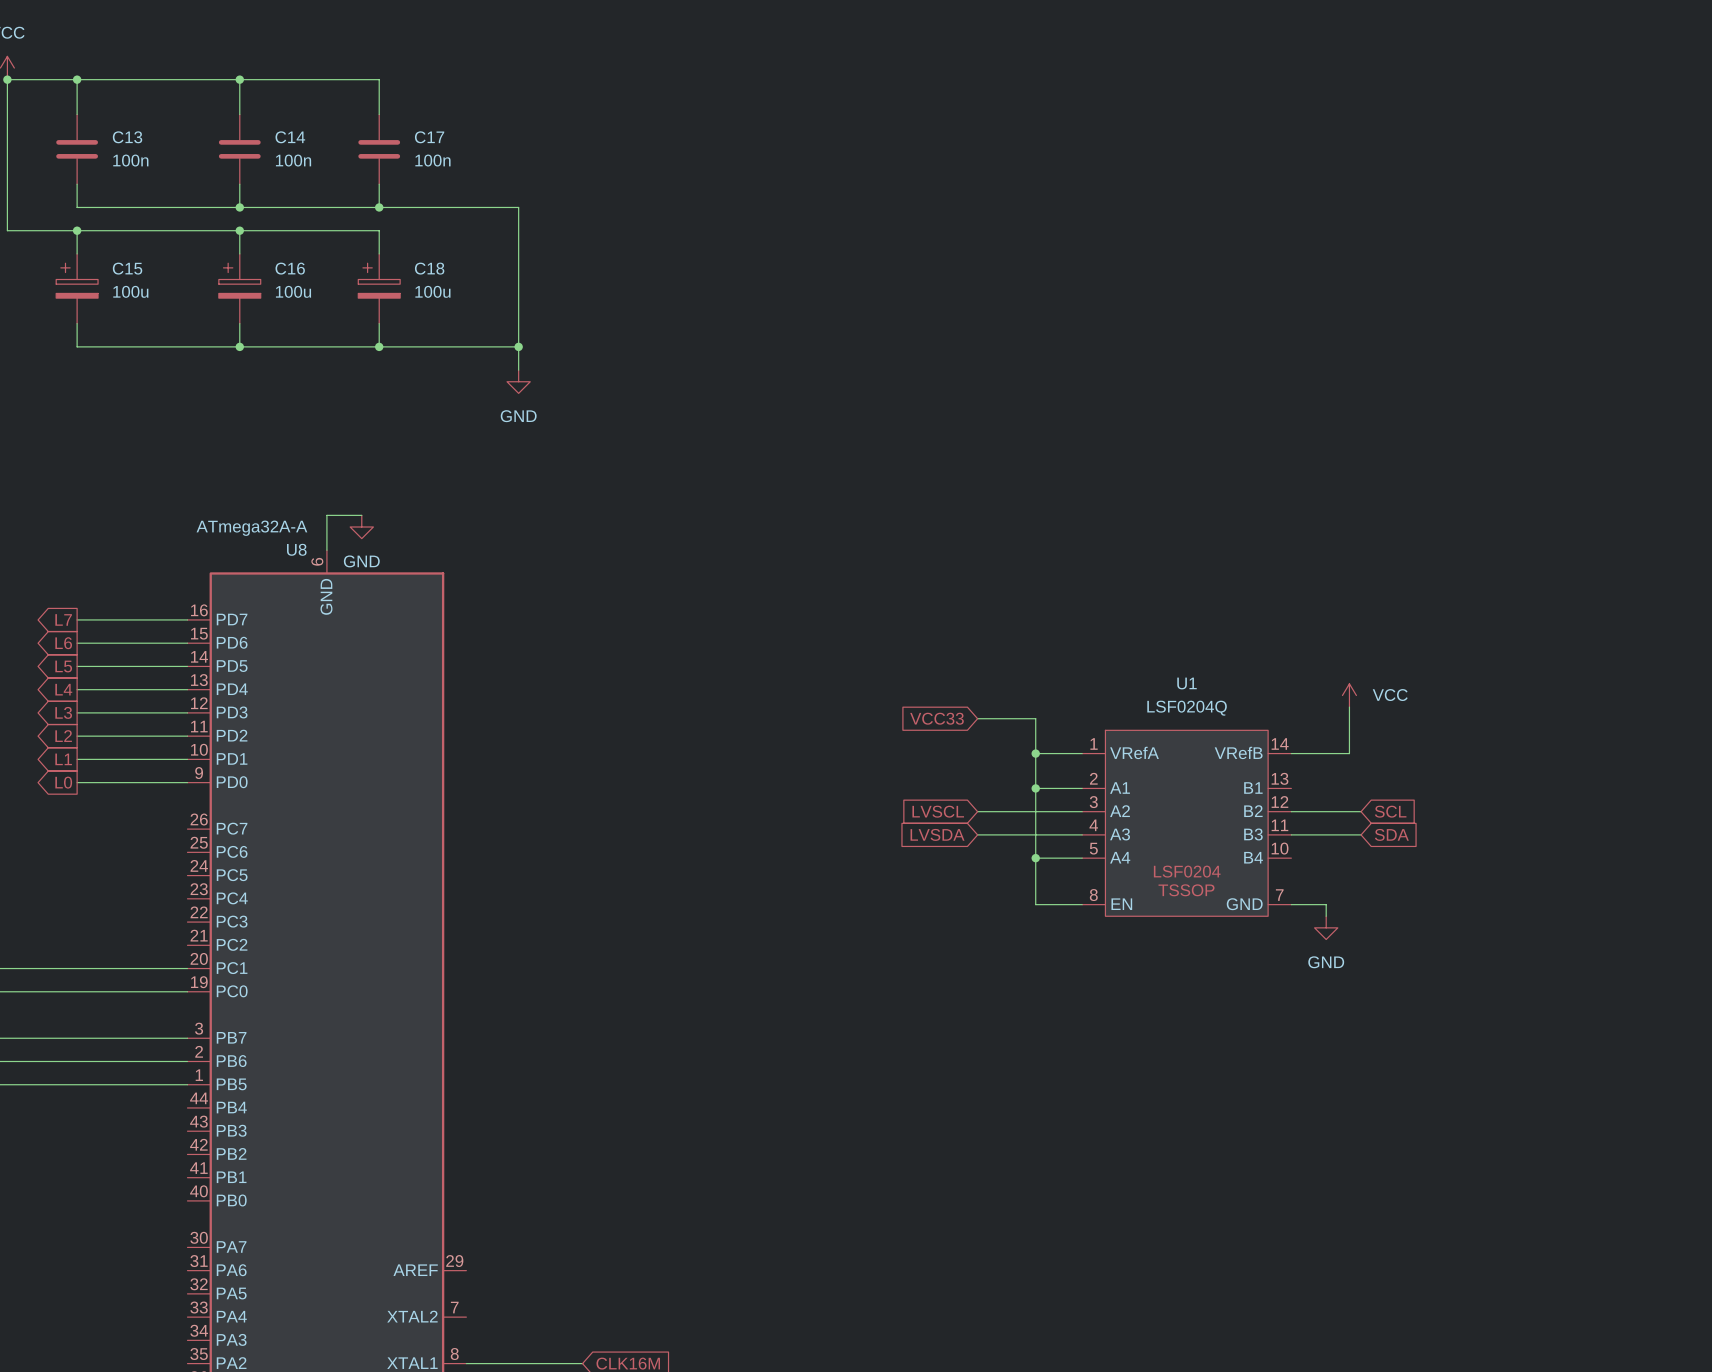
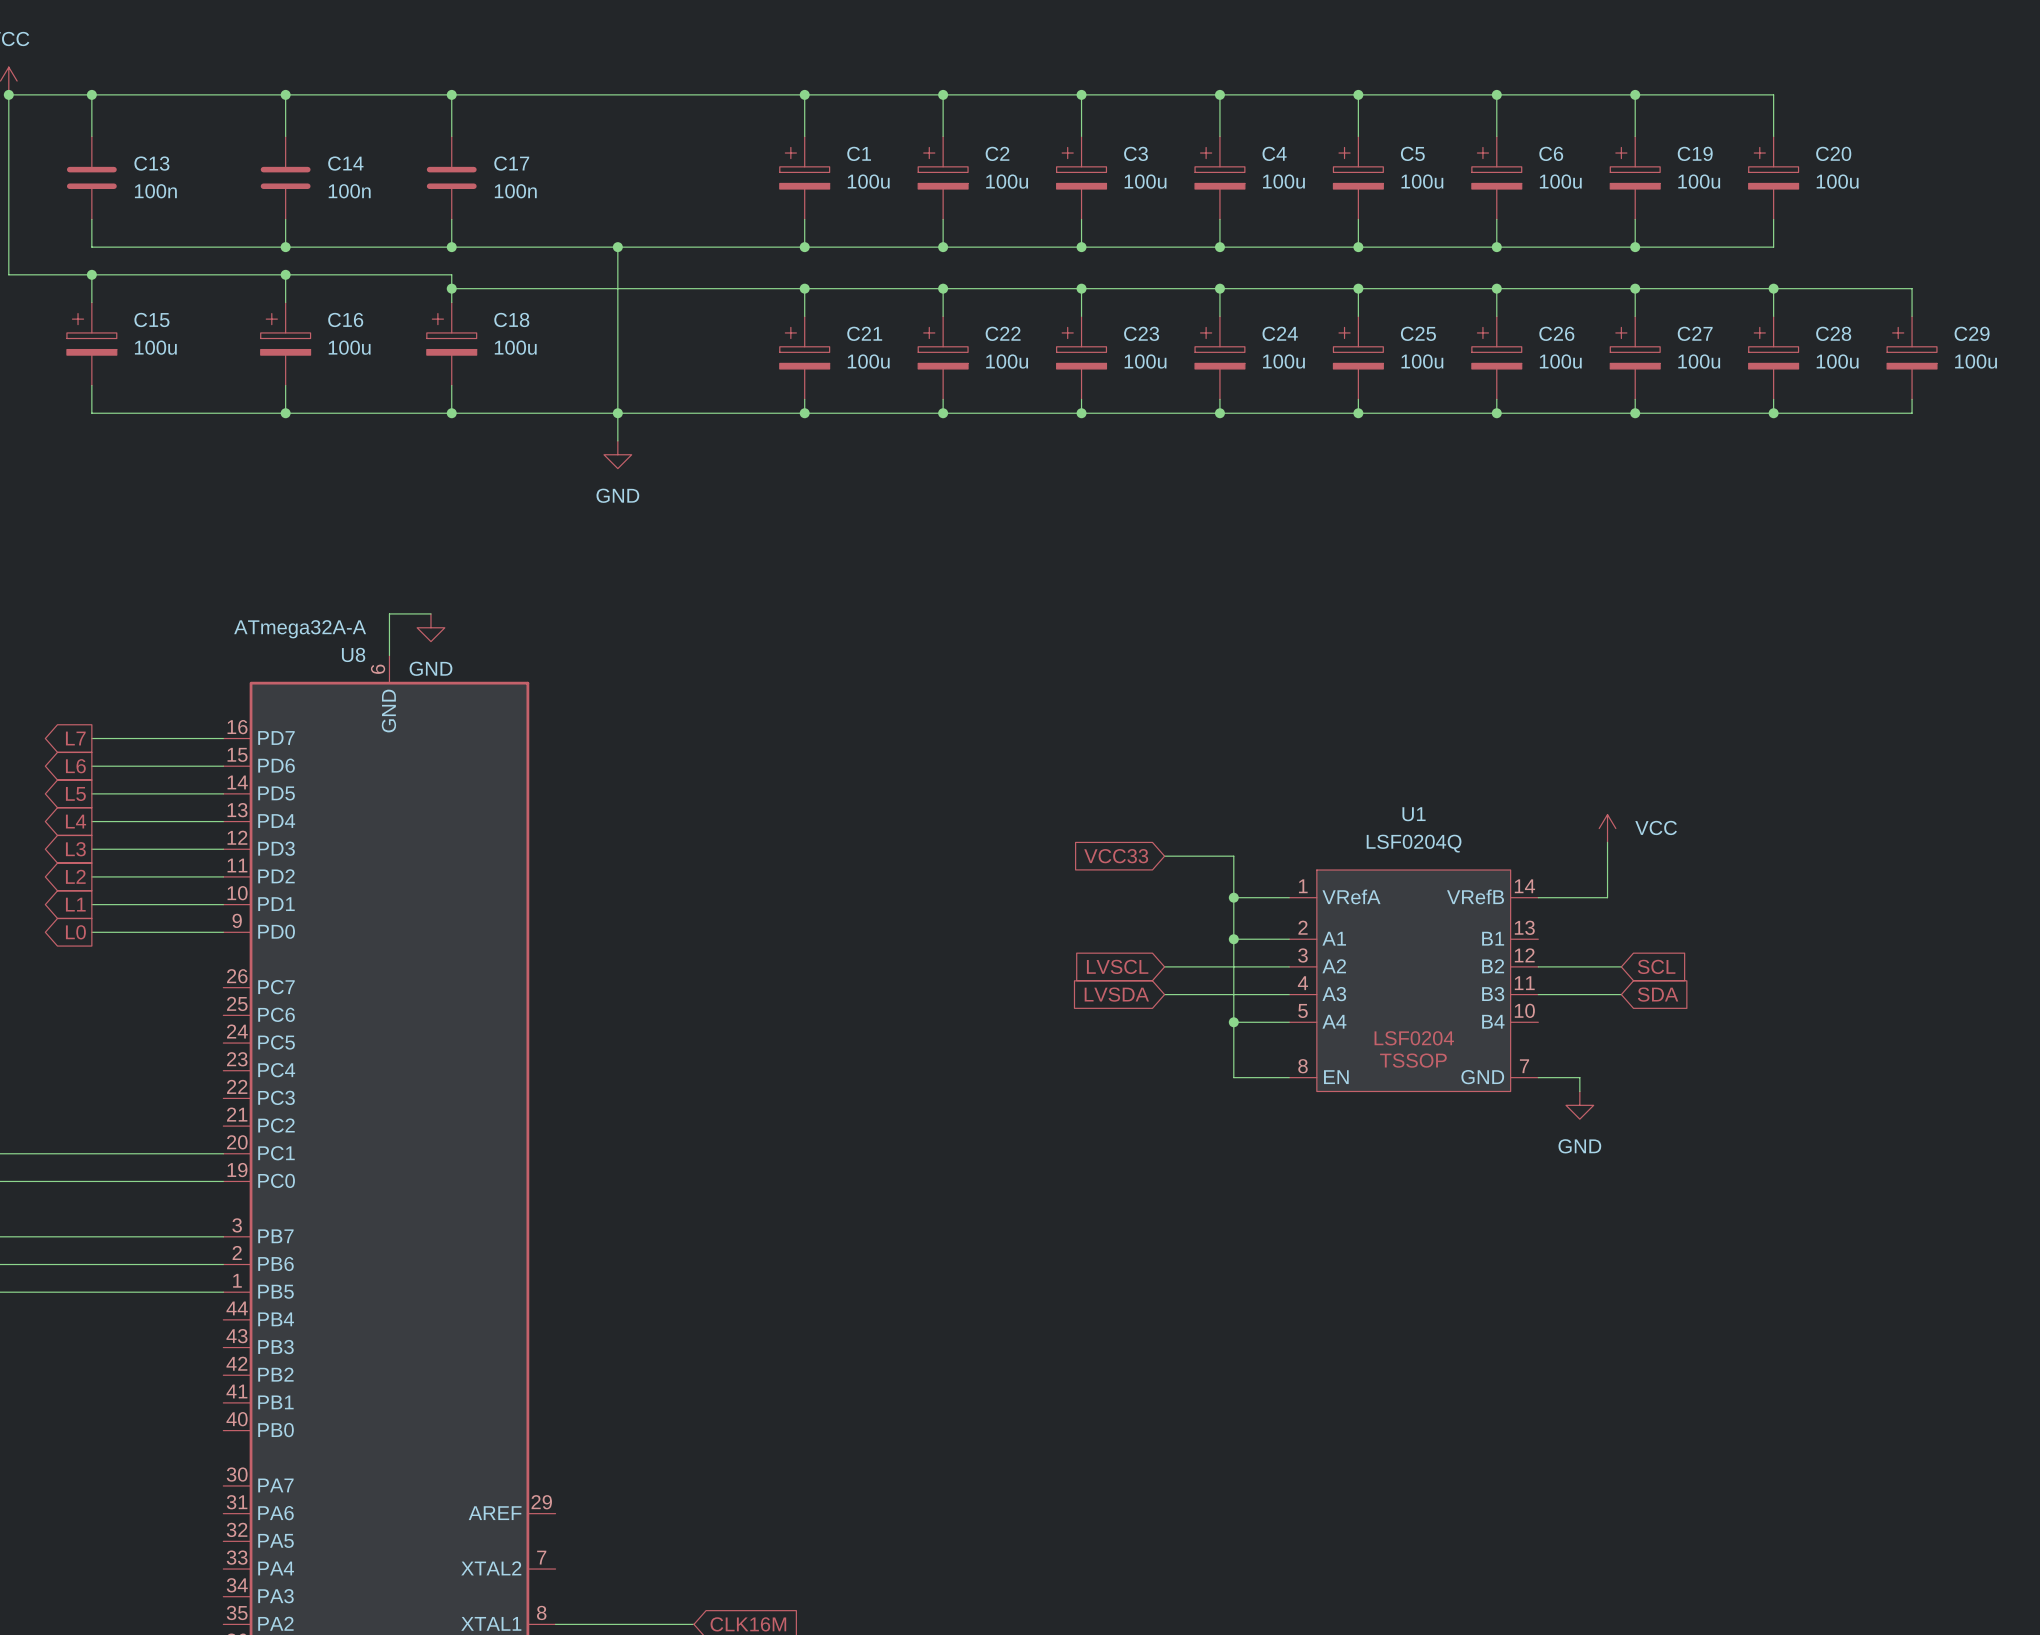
wire: none -> (451, 94) (1773, 94) (1773, 136)
junction: none -> (451, 94)
wire: none -> (804, 94) (804, 136)
junction: none -> (804, 94)
wire: none -> (943, 94) (943, 136)
junction: none -> (943, 94)
wire: none -> (1081, 94) (1081, 136)
junction: none -> (1081, 94)
wire: none -> (1219, 94) (1219, 136)
junction: none -> (1219, 94)
wire: none -> (1358, 94) (1358, 136)
junction: none -> (1358, 94)
wire: none -> (1496, 94) (1496, 136)
junction: none -> (1496, 94)
wire: none -> (1635, 94) (1635, 136)
junction: none -> (1635, 94)
C1: none -> 100u (804, 177)
C2: none -> 100u (943, 177)
C3: none -> 100u (1081, 177)
C4: none -> 100u (1219, 177)
C5: none -> 100u (1358, 177)
C6: none -> 100u (1496, 177)
C19: none -> 100u (1635, 177)
C20: none -> 100u (1773, 177)
wire: none -> (804, 219) (804, 247)
wire: none -> (943, 219) (943, 247)
wire: none -> (1081, 219) (1081, 247)
wire: none -> (1219, 219) (1219, 247)
wire: none -> (1358, 219) (1358, 247)
wire: none -> (1496, 219) (1496, 247)
wire: none -> (1635, 219) (1635, 247)
wire: none -> (1773, 219) (1773, 247) (617, 247)
junction: none -> (617, 247)
junction: none -> (804, 247)
junction: none -> (943, 247)
junction: none -> (1081, 247)
junction: none -> (1219, 247)
junction: none -> (1358, 247)
junction: none -> (1496, 247)
junction: none -> (1635, 247)
wire: none -> (451, 288) (1912, 288) (1912, 316)
junction: none -> (451, 288)
wire: none -> (804, 288) (804, 316)
junction: none -> (804, 288)
wire: none -> (943, 288) (943, 316)
junction: none -> (943, 288)
wire: none -> (1081, 288) (1081, 316)
junction: none -> (1081, 288)
wire: none -> (1219, 288) (1219, 316)
junction: none -> (1219, 288)
wire: none -> (1358, 288) (1358, 316)
junction: none -> (1358, 288)
wire: none -> (1496, 288) (1496, 316)
junction: none -> (1496, 288)
wire: none -> (1635, 288) (1635, 316)
junction: none -> (1635, 288)
wire: none -> (1773, 288) (1773, 316)
junction: none -> (1773, 288)
C21: none -> 100u (804, 357)
C22: none -> 100u (943, 357)
C23: none -> 100u (1081, 357)
C24: none -> 100u (1219, 357)
C25: none -> 100u (1358, 357)
C26: none -> 100u (1496, 357)
C27: none -> 100u (1635, 357)
C28: none -> 100u (1773, 357)
C29: none -> 100u (1912, 357)
wire: none -> (804, 399) (804, 413)
wire: none -> (943, 399) (943, 413)
wire: none -> (1081, 399) (1081, 413)
wire: none -> (1219, 399) (1219, 413)
wire: none -> (1358, 399) (1358, 413)
wire: none -> (1496, 399) (1496, 413)
wire: none -> (1635, 399) (1635, 413)
wire: none -> (1773, 399) (1773, 413)
wire: none -> (1912, 399) (1912, 413) (617, 413)
junction: none -> (804, 413)
junction: none -> (943, 413)
junction: none -> (1081, 413)
junction: none -> (1219, 413)
junction: none -> (1358, 413)
junction: none -> (1496, 413)
junction: none -> (1635, 413)
junction: none -> (1773, 413)

